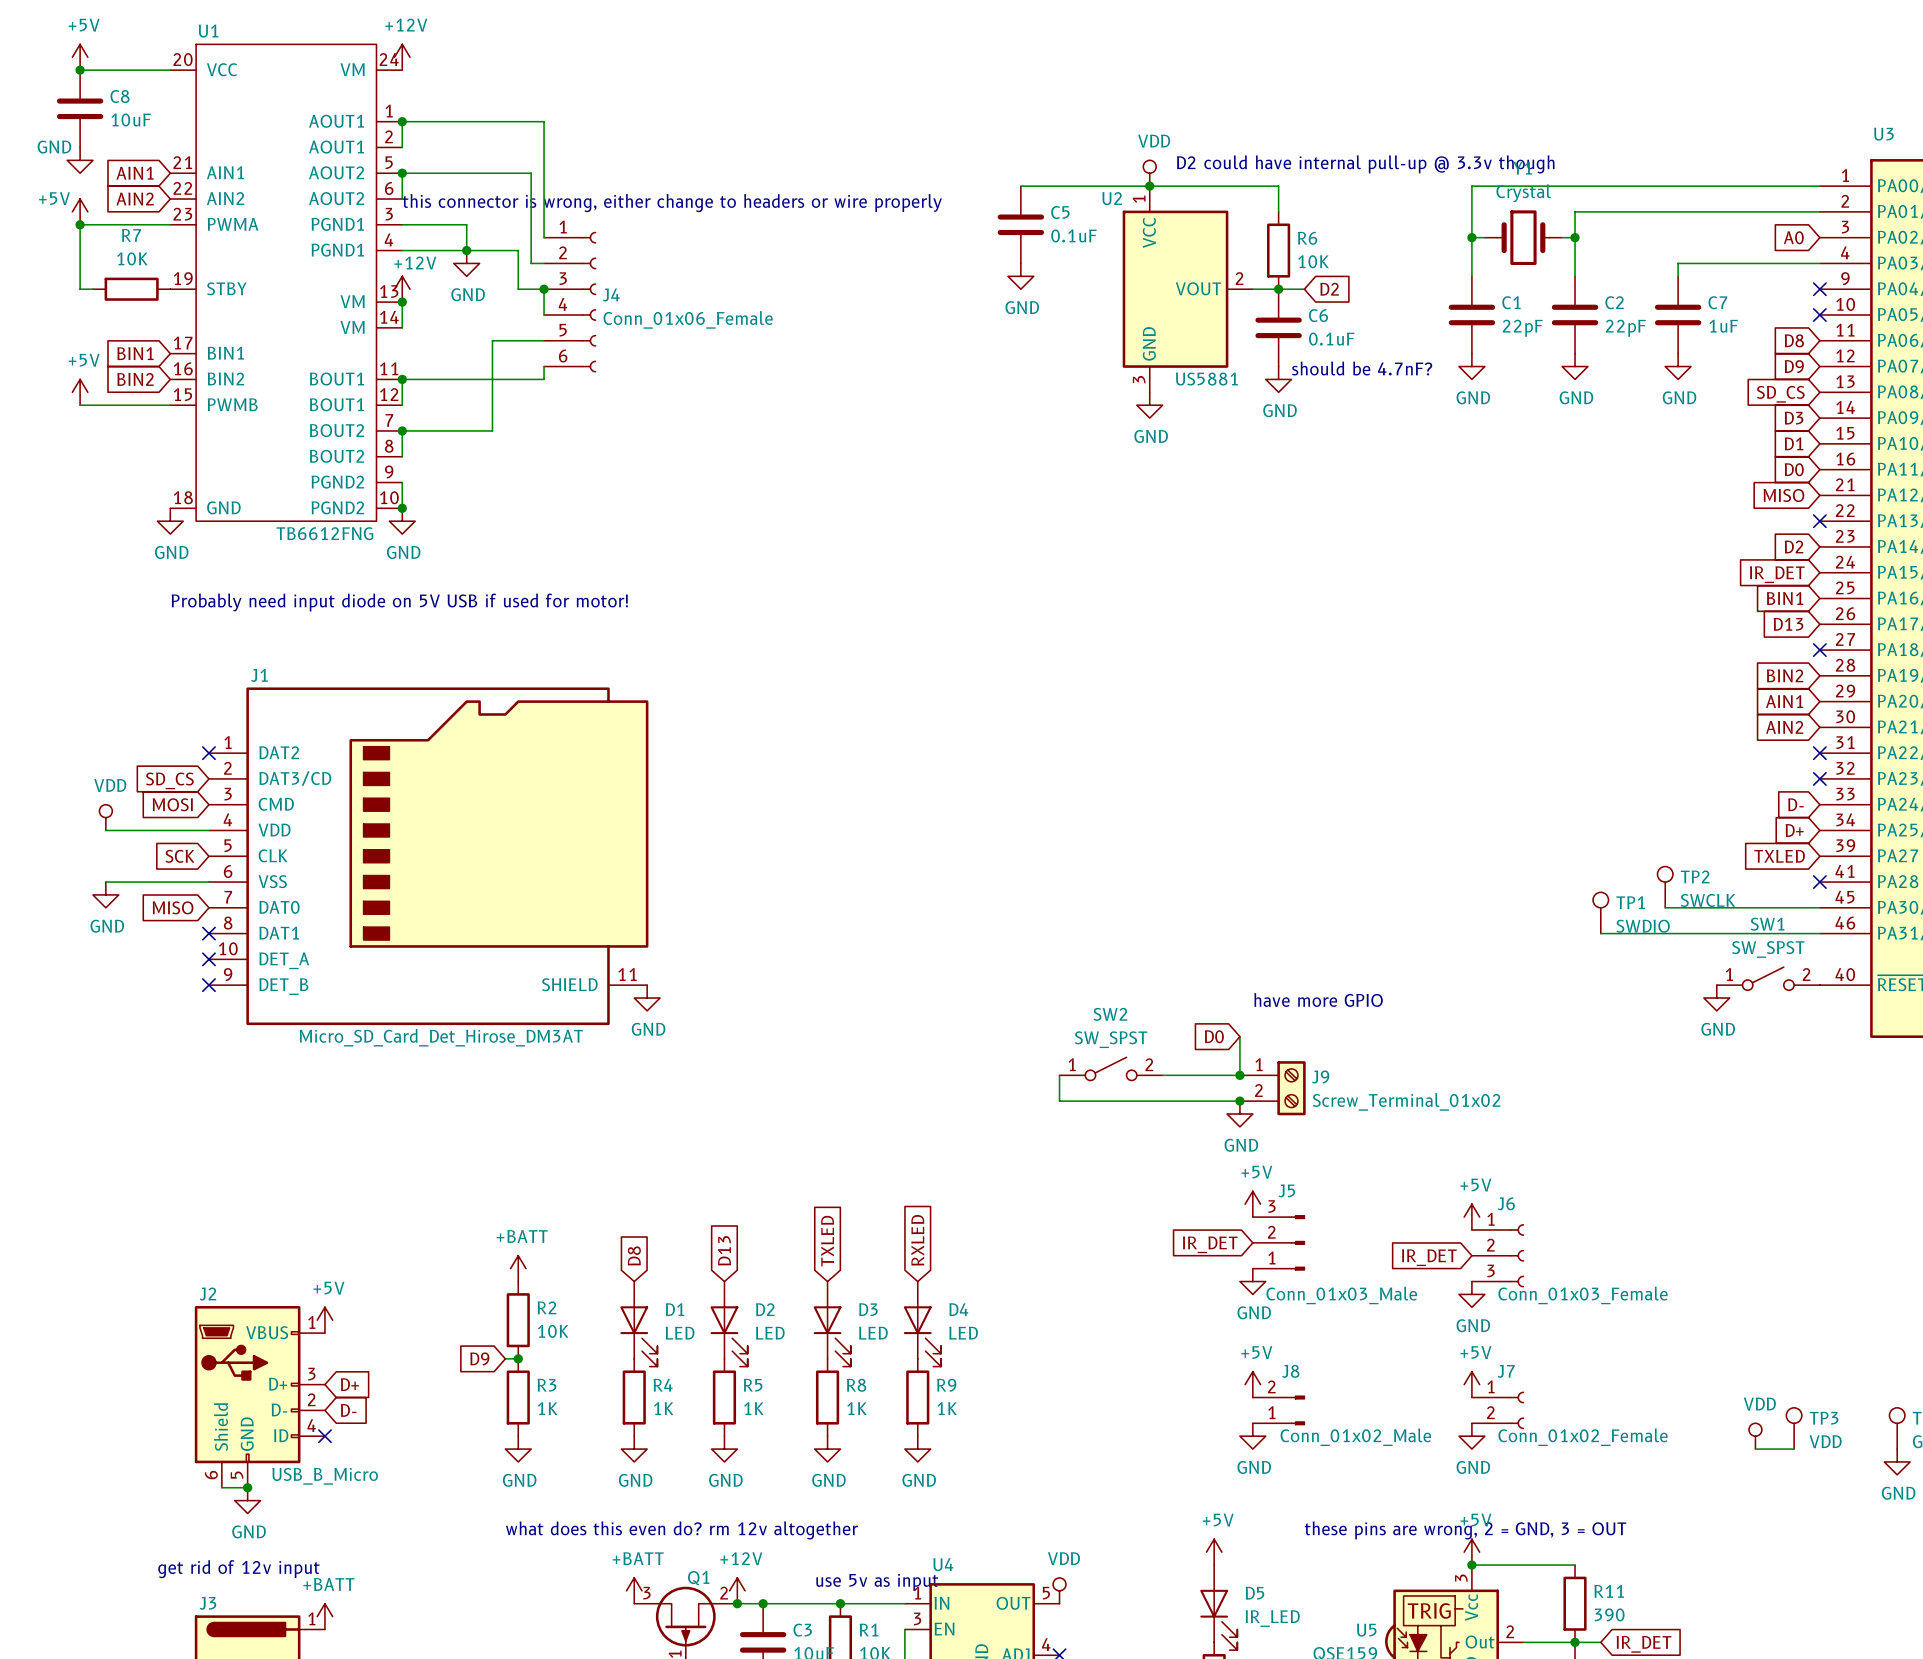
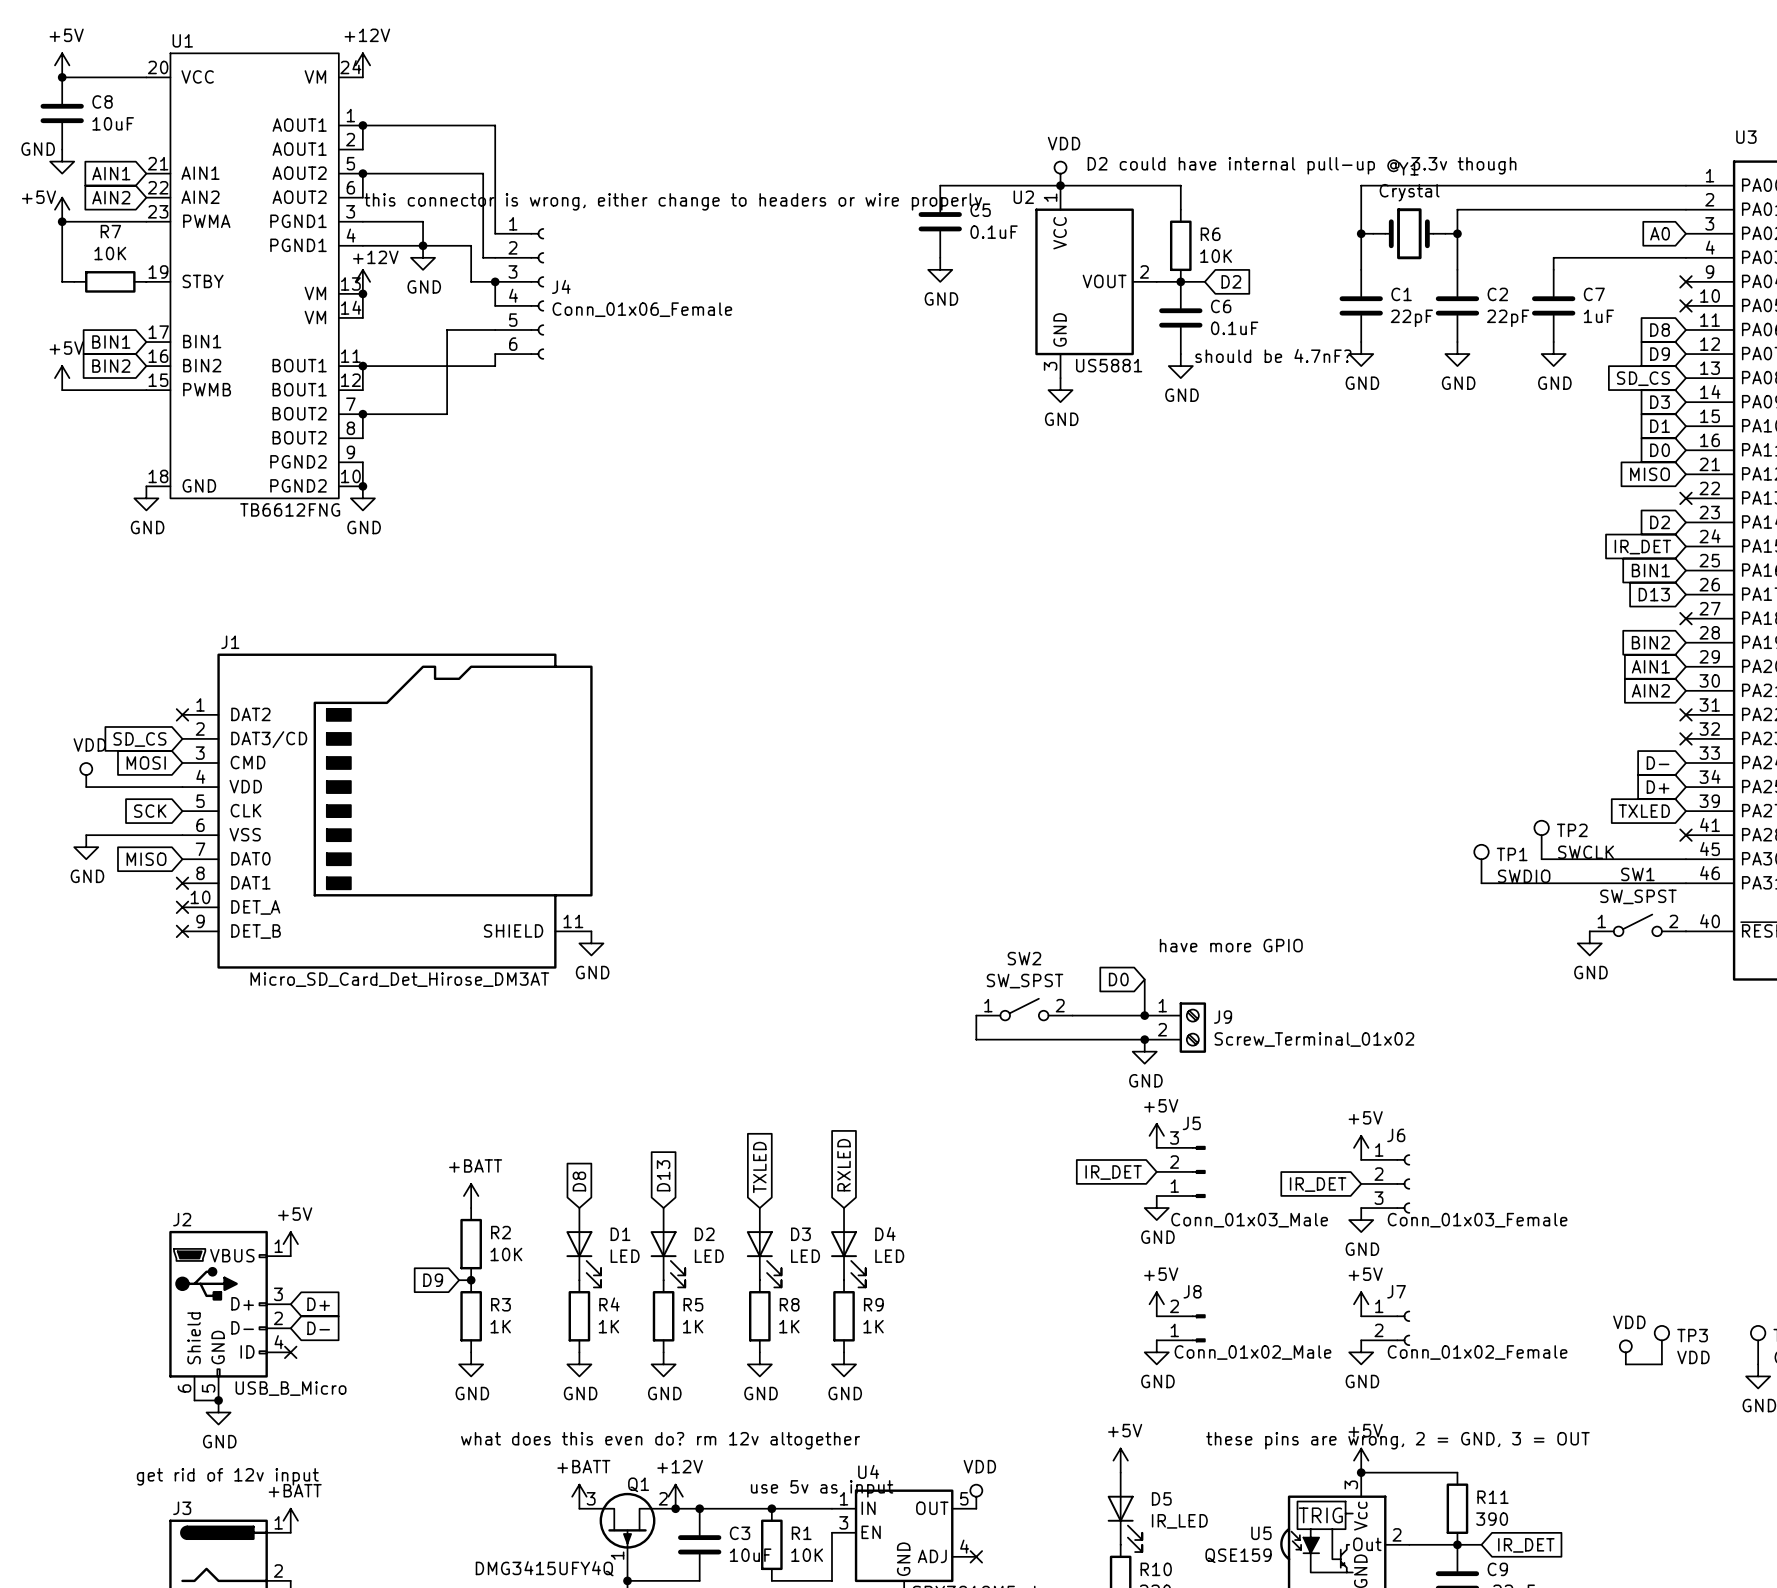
text: Probably need input diode on 5V USB if used for motor! (399, 602) -> none

